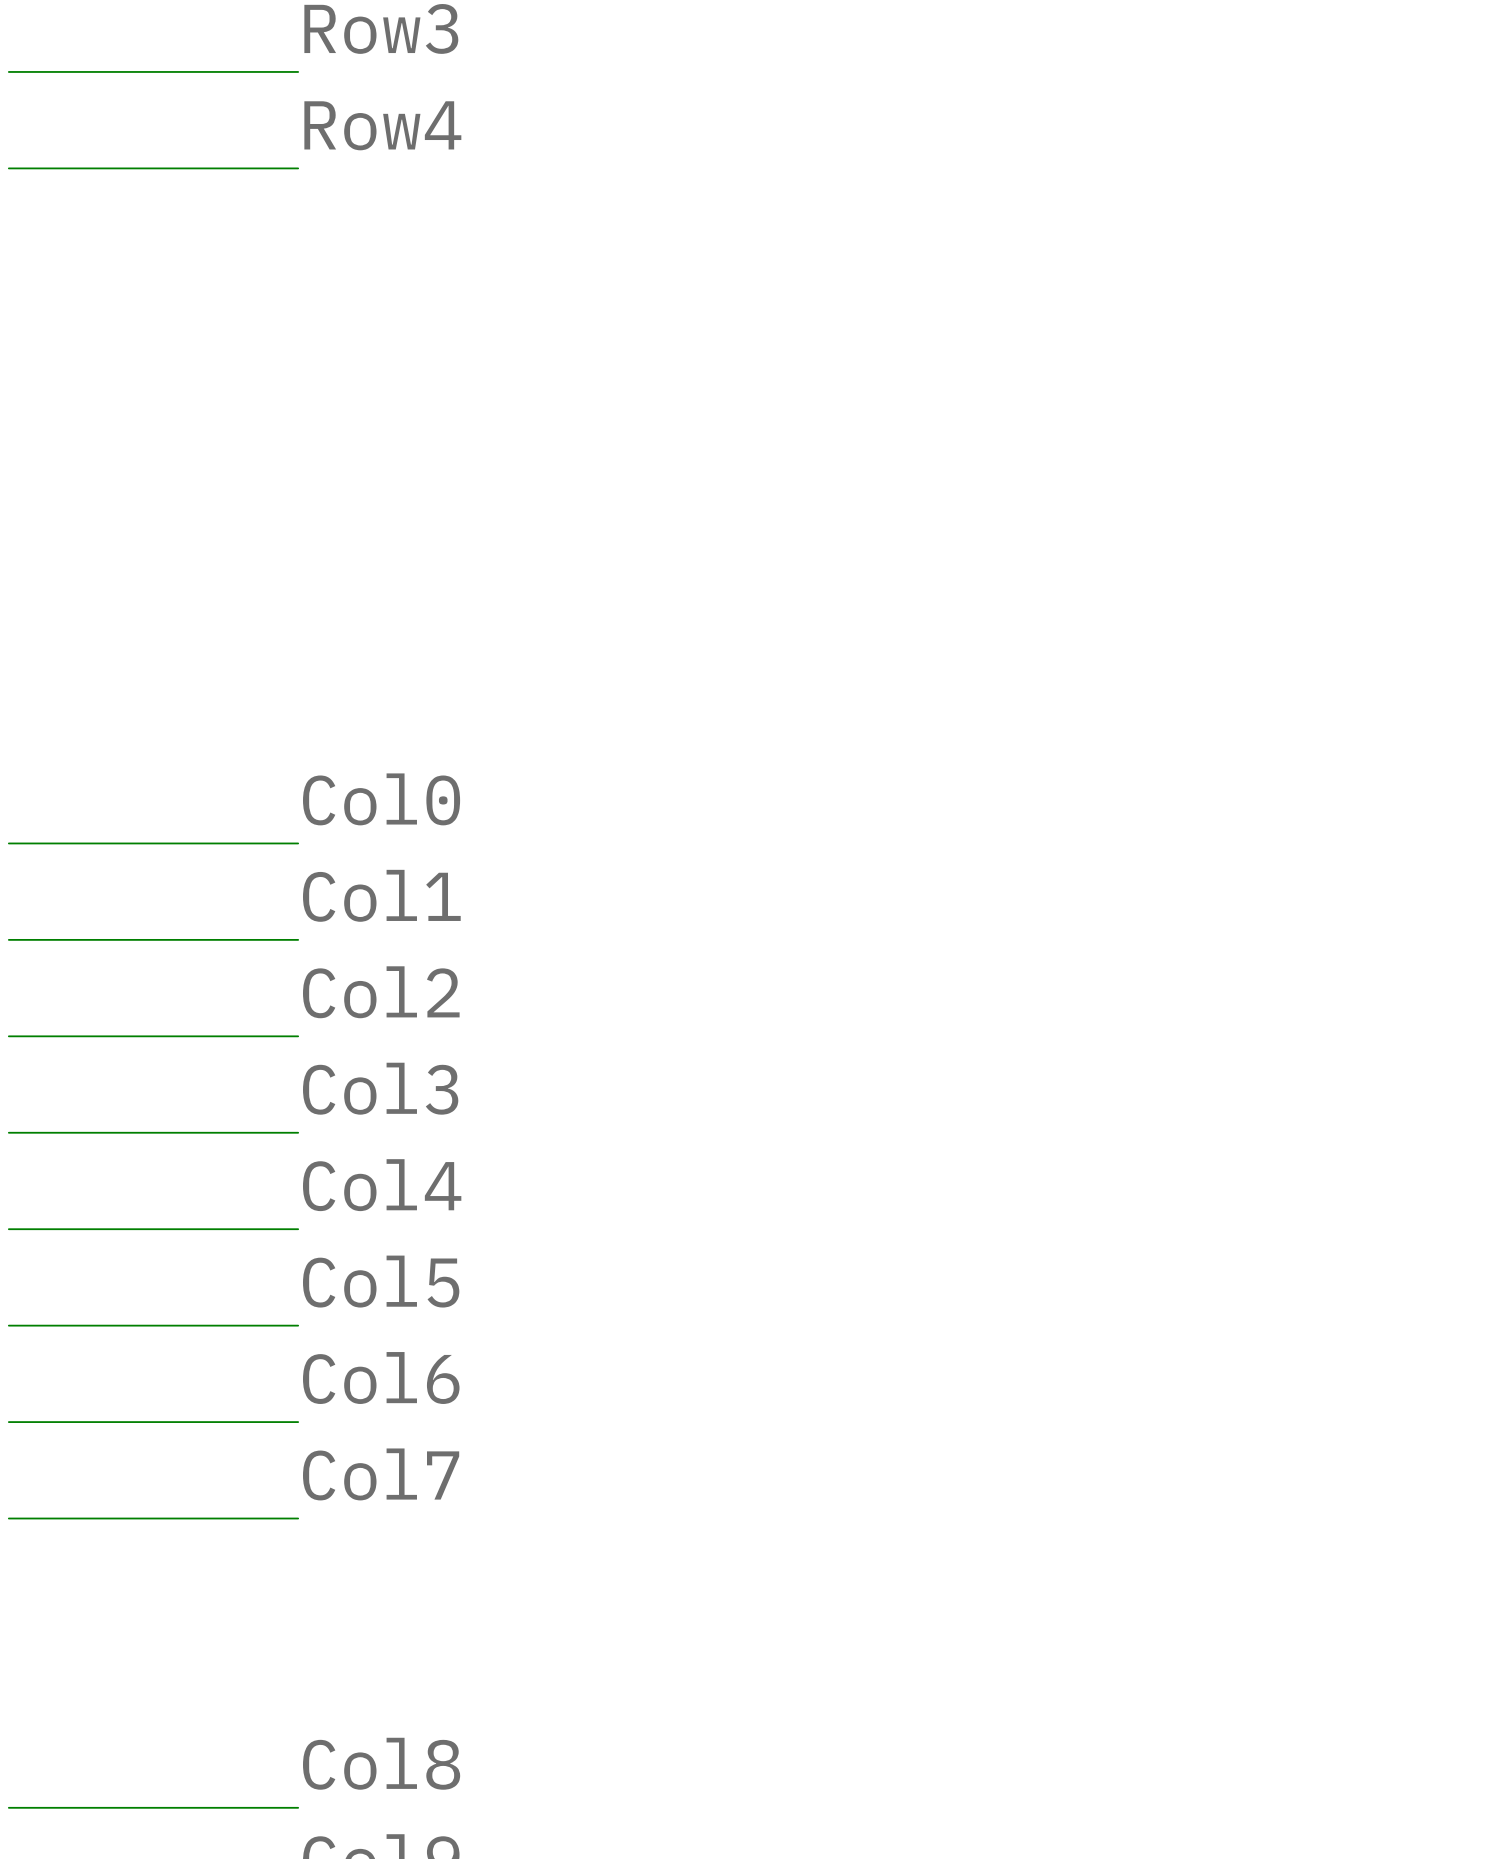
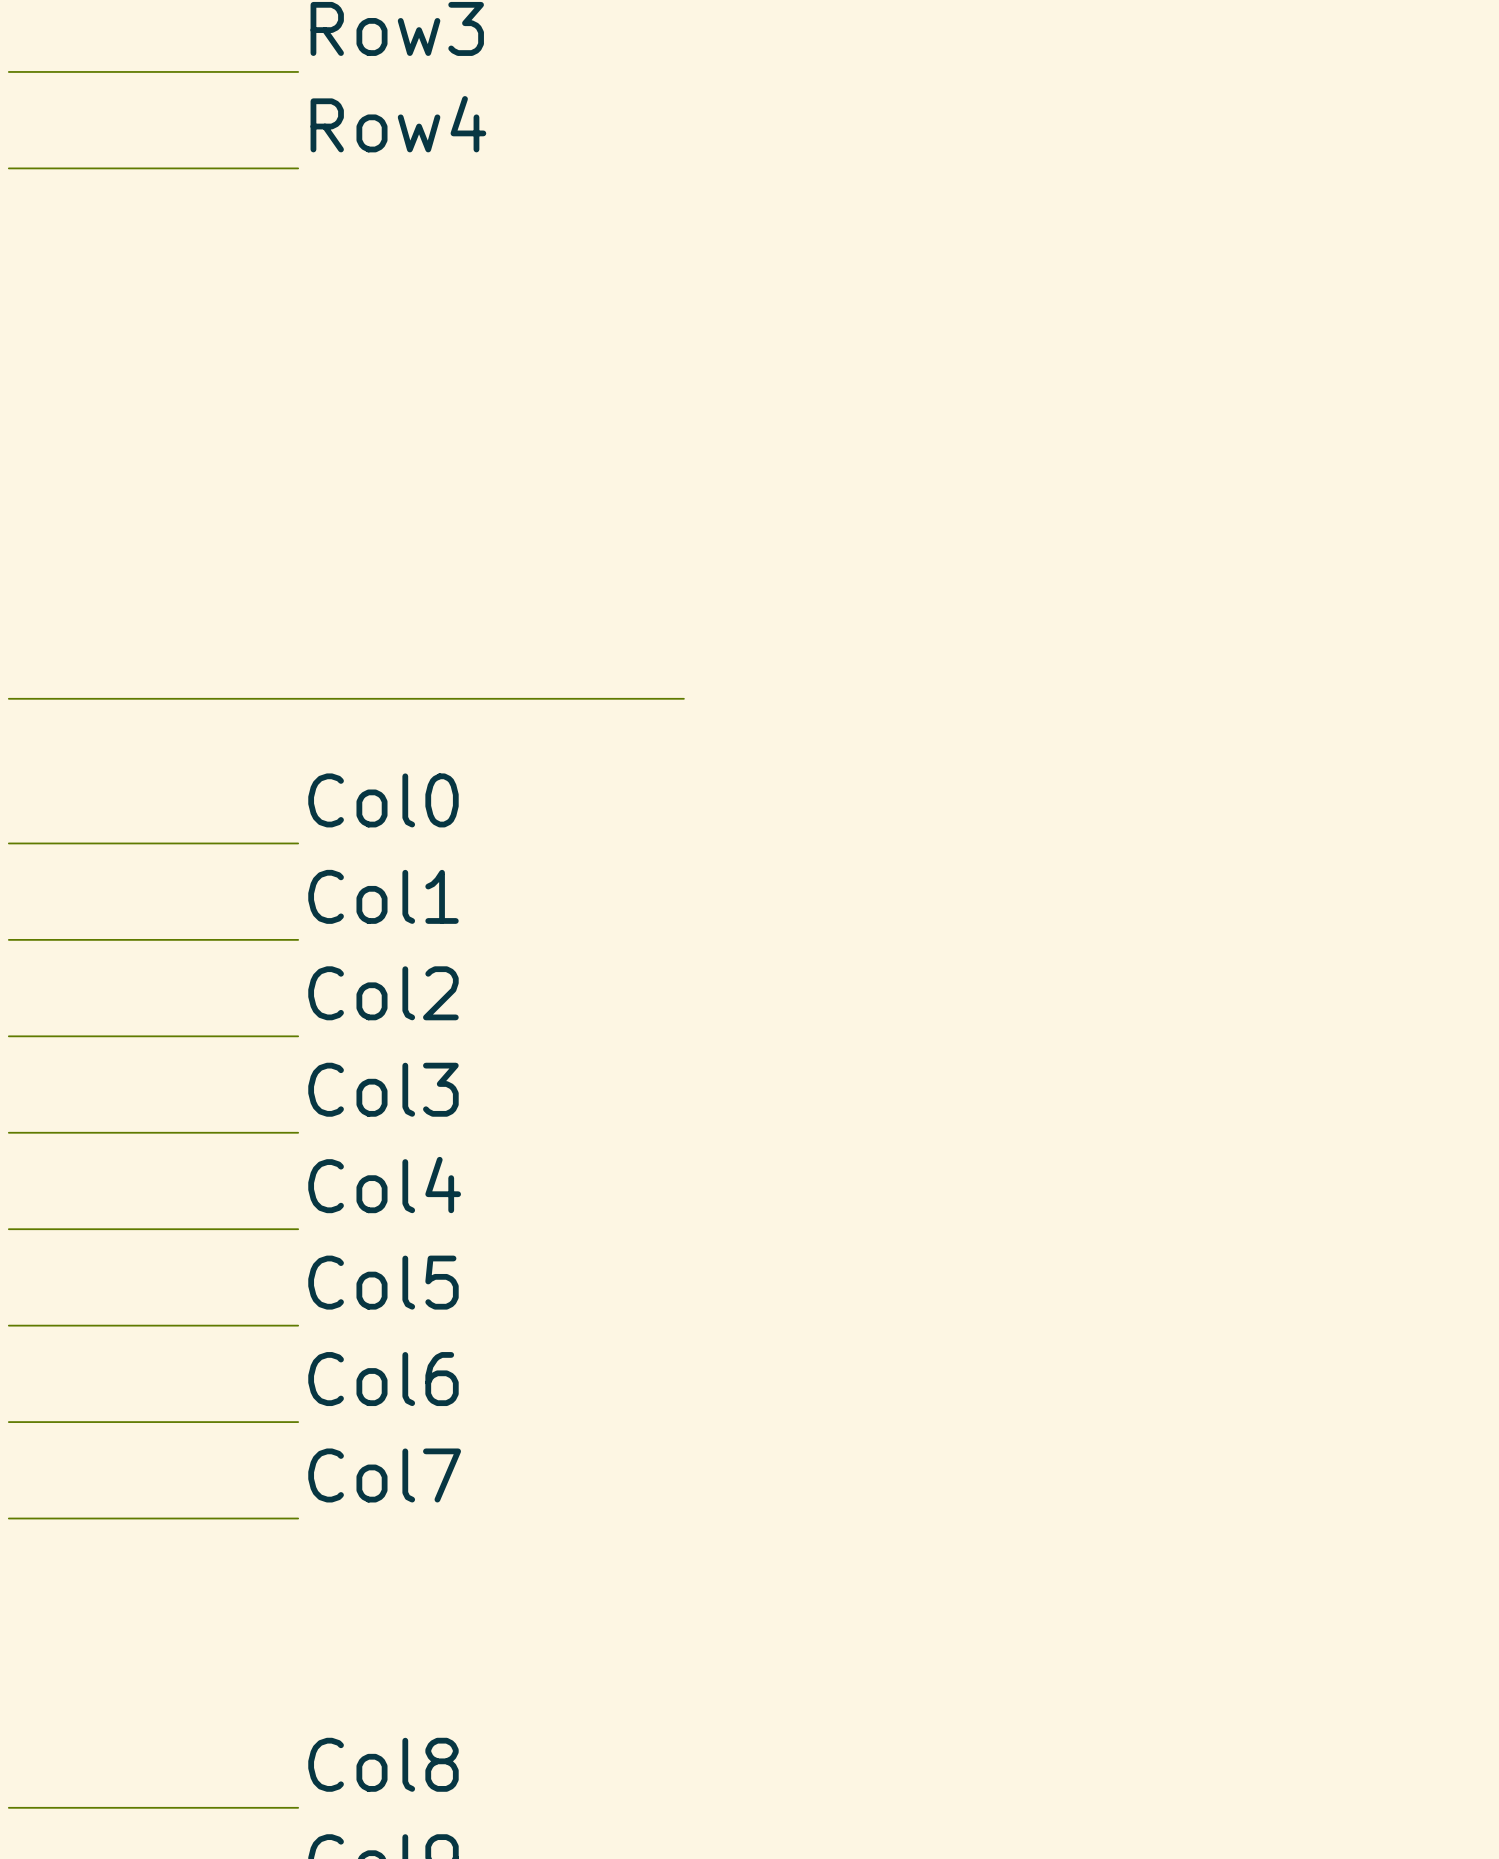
wire: none -> (8, 698) (683, 698)

